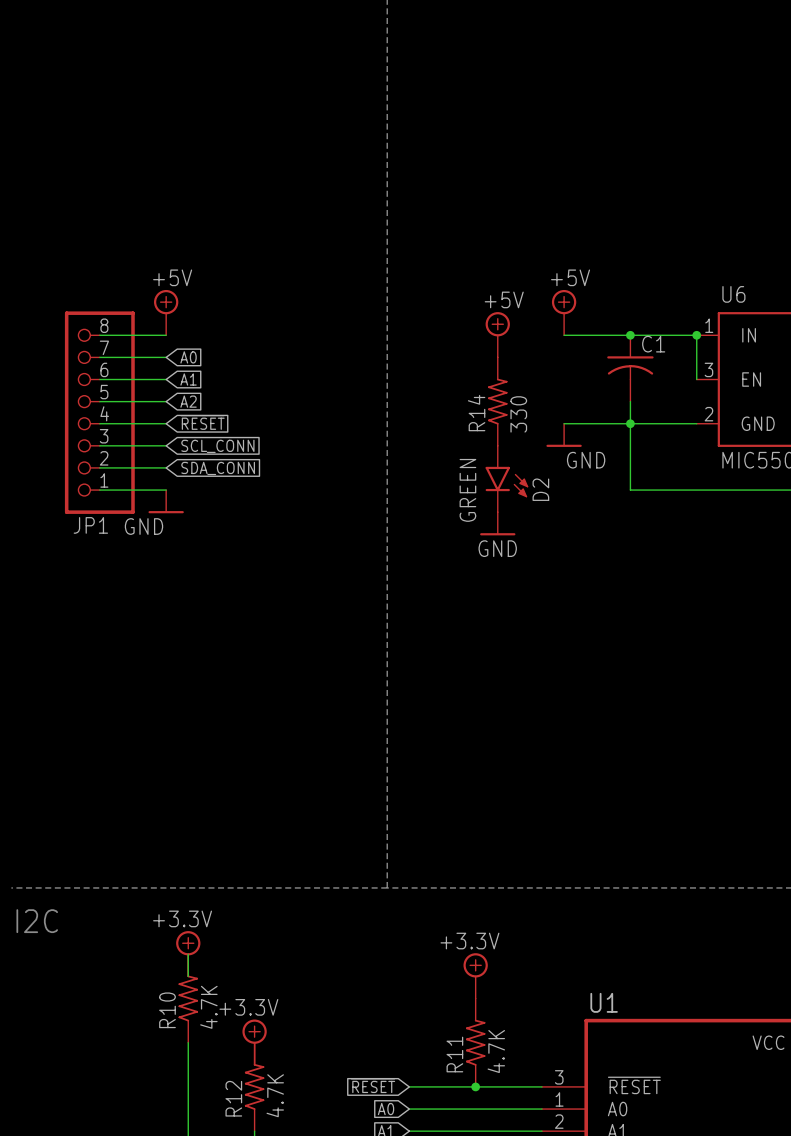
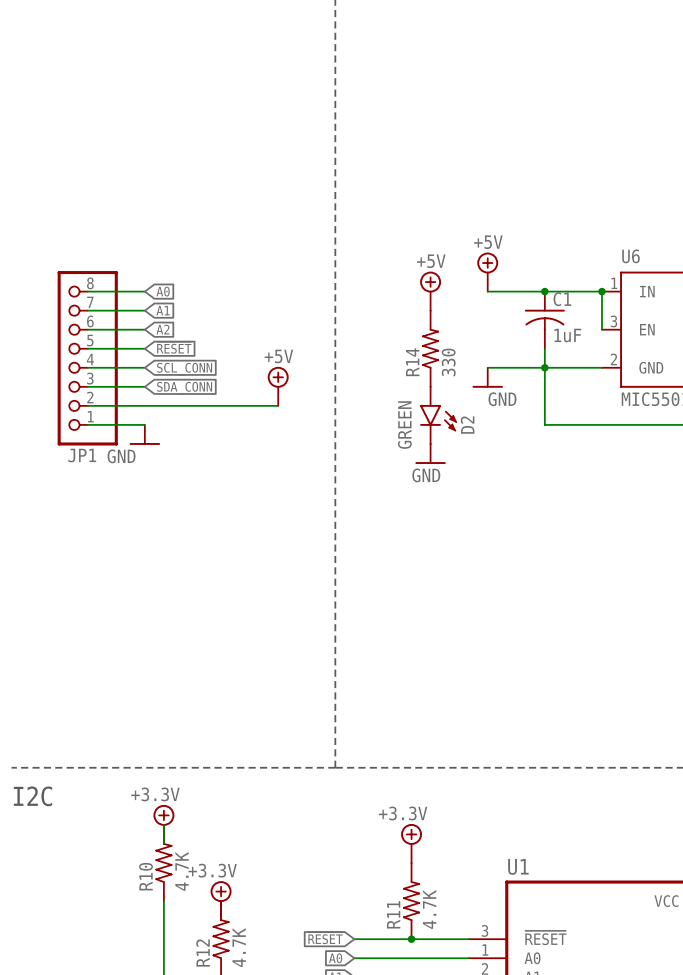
power symbol position: +5V (166, 312) -> +5V (278, 386)
global label: none -> A0 (163, 291)
global label: A0 (188, 357) -> A1 (163, 310)
global label: A1 (188, 379) -> A2 (162, 329)
C1 value: none -> 1uF (567, 335)
global label: A2 (188, 401) -> ~{RESET} (174, 347)
global label: ~{RESET} (202, 422) -> SCL_CONN (184, 369)
global label: SCL_CONN (217, 446) -> SDA_CONN (184, 388)
wire: none -> (144, 405) (278, 405)
global label: SDA_CONN (218, 468) -> none

